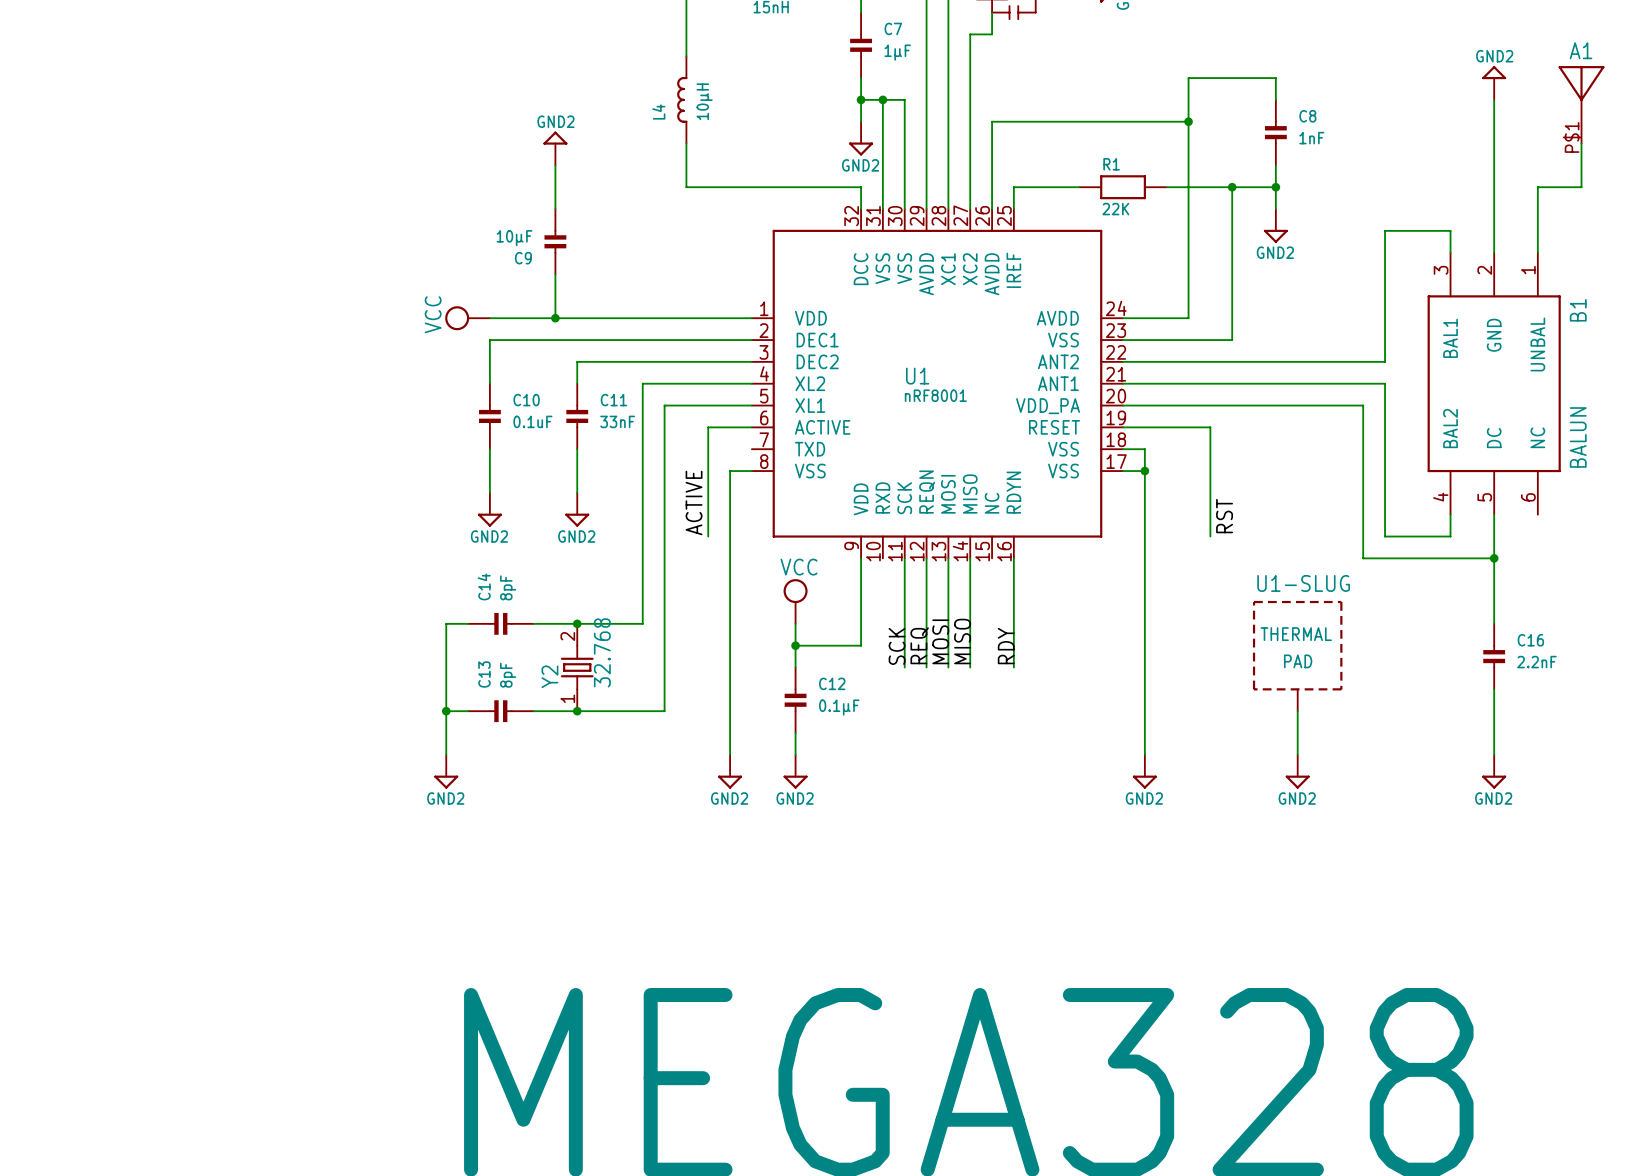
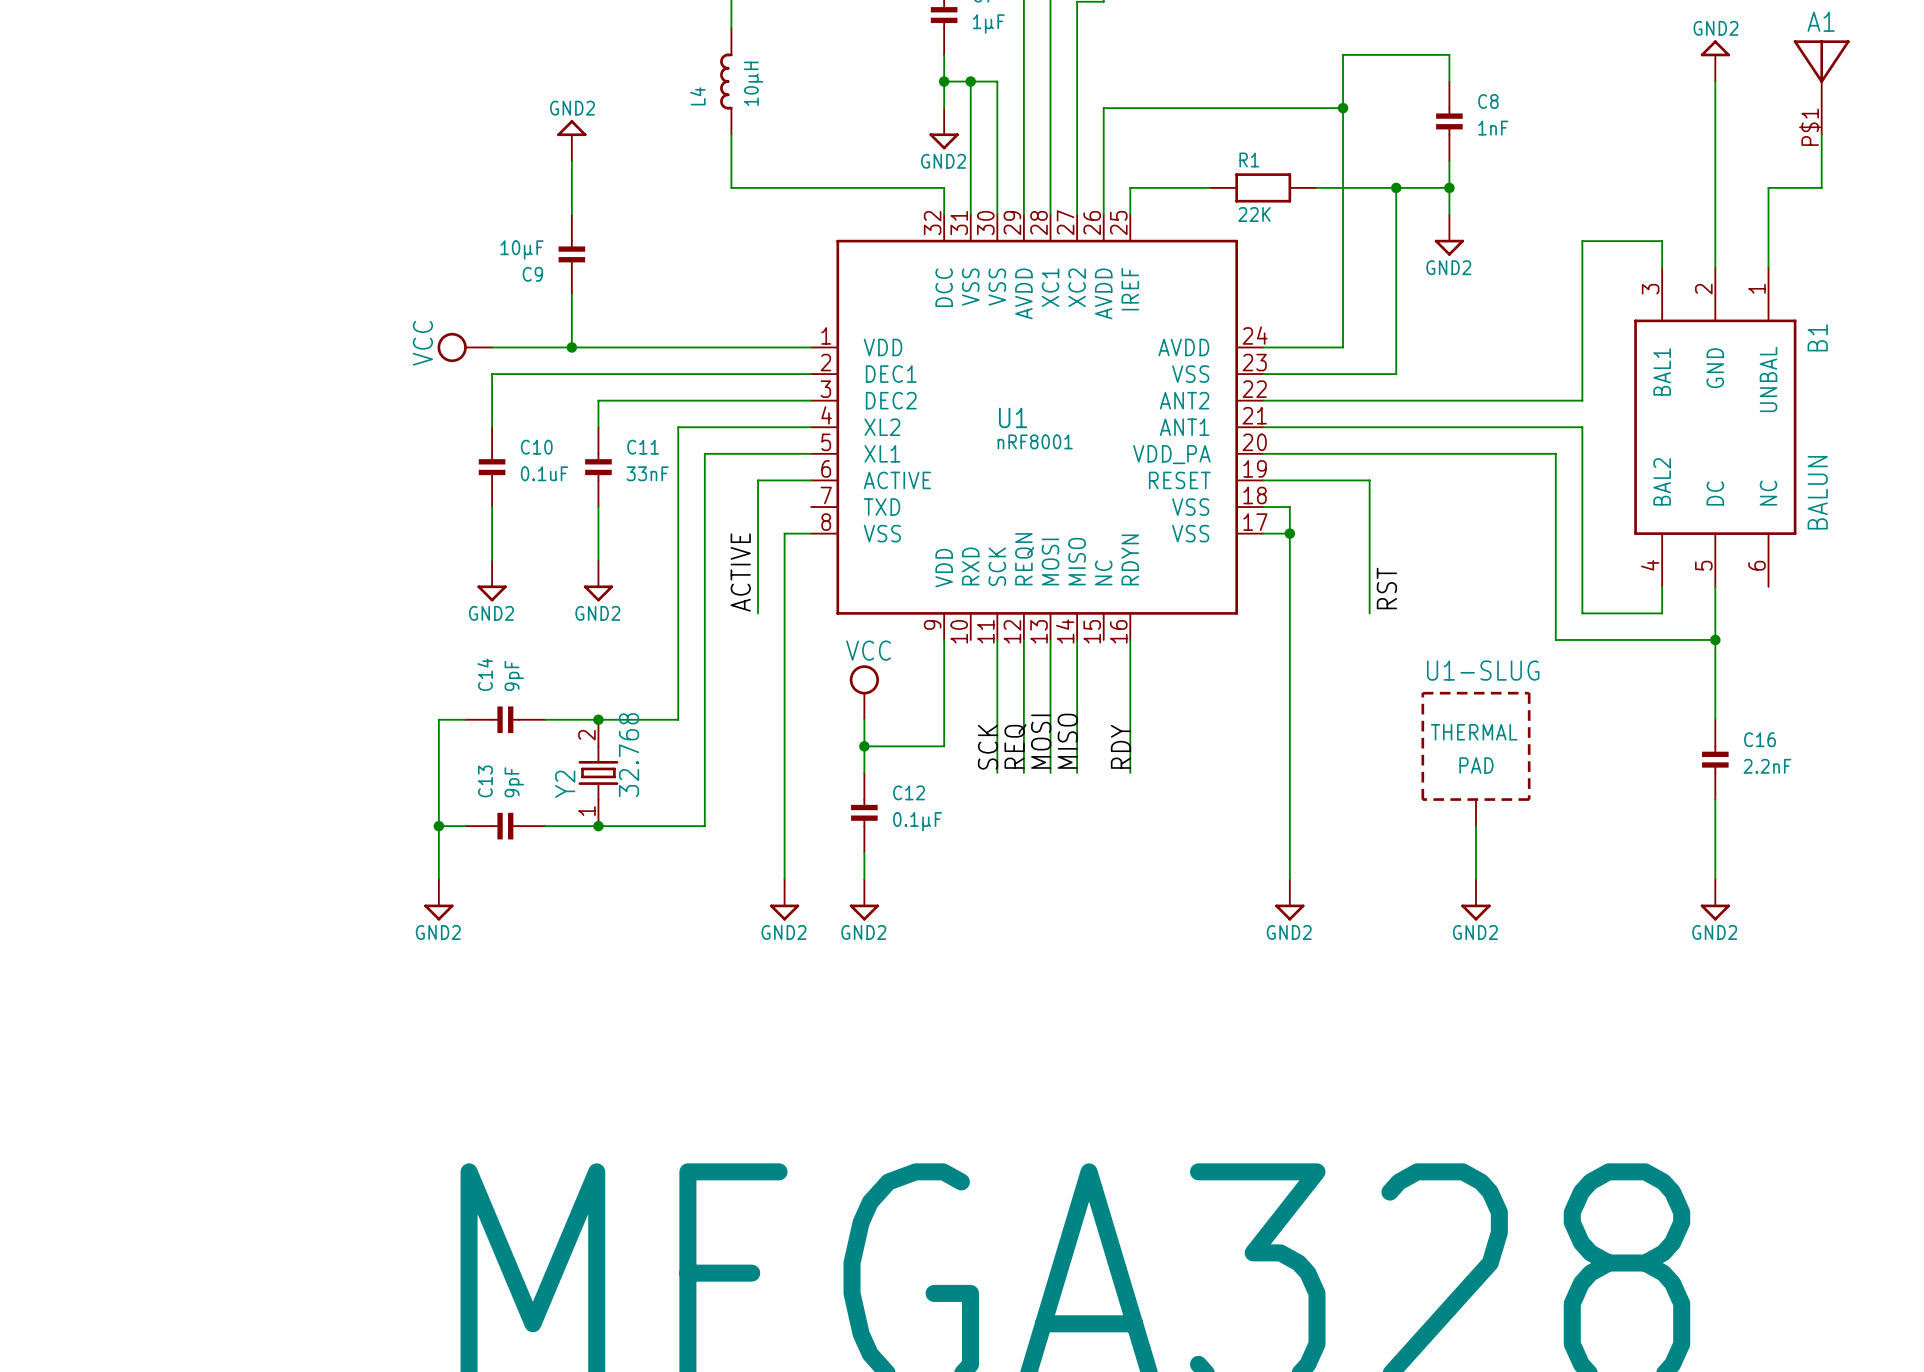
C14 value: 8pF (508, 587) -> 9pF (514, 675)
C13 value: 8pF (508, 675) -> 9pF (514, 782)

